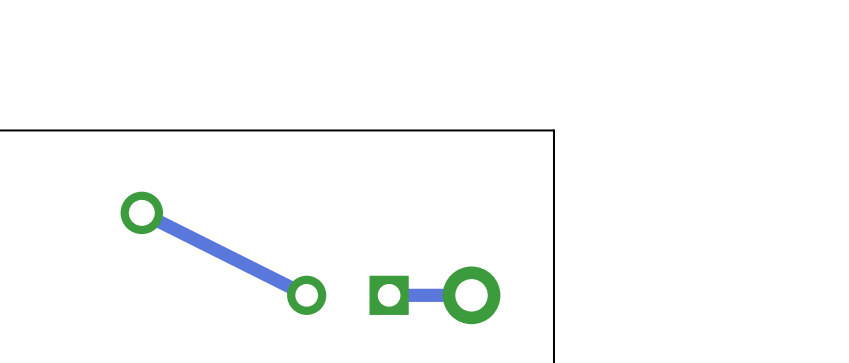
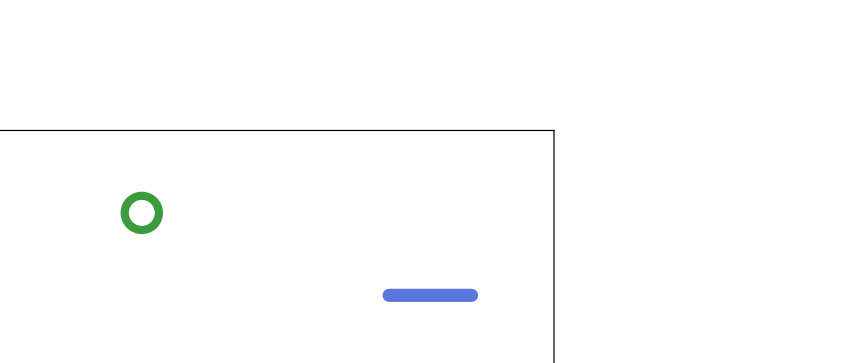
bottom track: (141, 212) (306, 295) -> none
part: (347, 295) -> none
part: (471, 295) -> none

